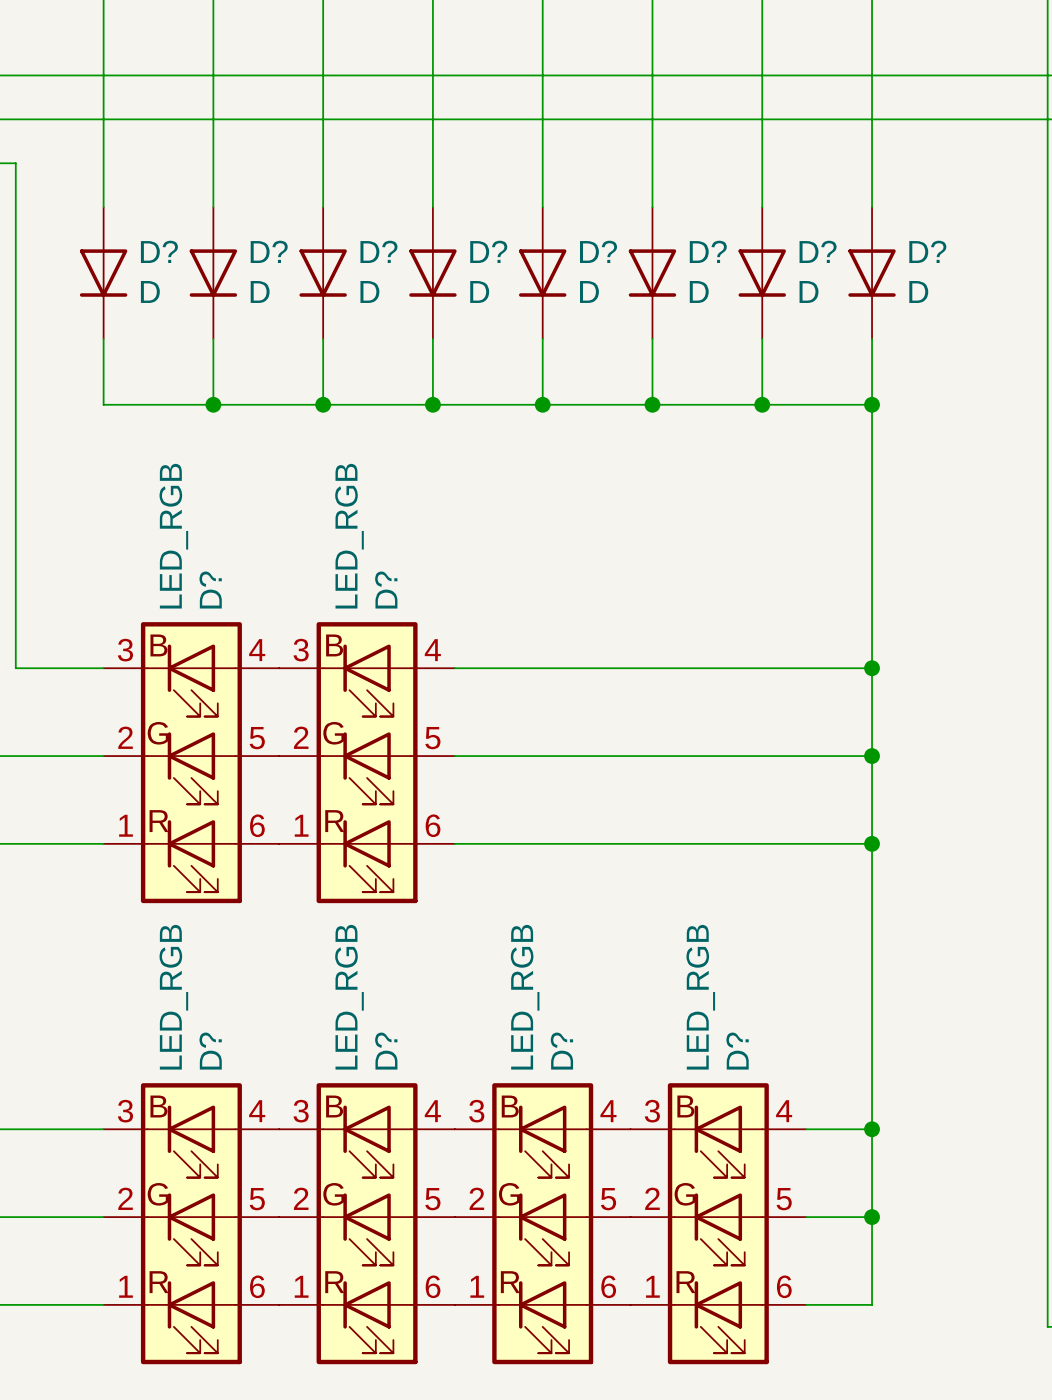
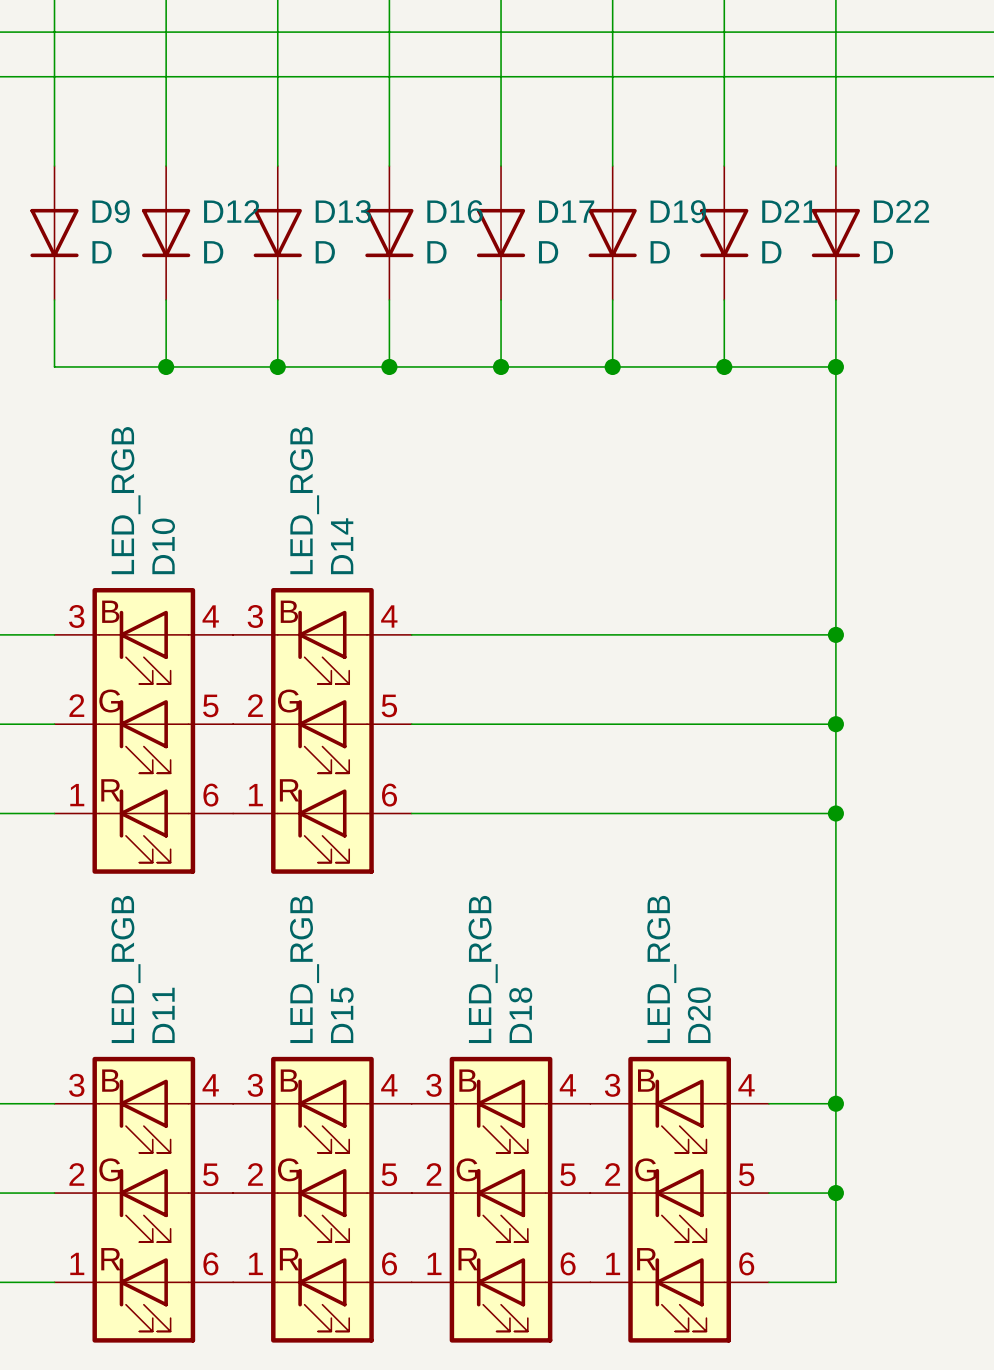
D? name: D? (159, 251) -> D9 (111, 211)
D? name: D? (269, 251) -> D12 (231, 211)
D? name: D? (378, 251) -> D13 (343, 211)
D? name: D? (488, 251) -> D16 (455, 211)
D? name: D? (598, 251) -> D17 (566, 211)
D? name: D? (708, 251) -> D19 (678, 211)
D? name: D? (818, 251) -> D21 (789, 211)
D? name: D? (927, 251) -> D22 (901, 211)
D? name: D? (210, 590) -> D10 (163, 546)
D? name: D? (386, 590) -> D14 (342, 546)
D? name: D? (210, 1051) -> D11 (163, 1015)
D? name: D? (386, 1051) -> D15 (342, 1015)
D? name: D? (561, 1051) -> D18 (520, 1015)
D? name: D? (737, 1051) -> D20 (699, 1015)

